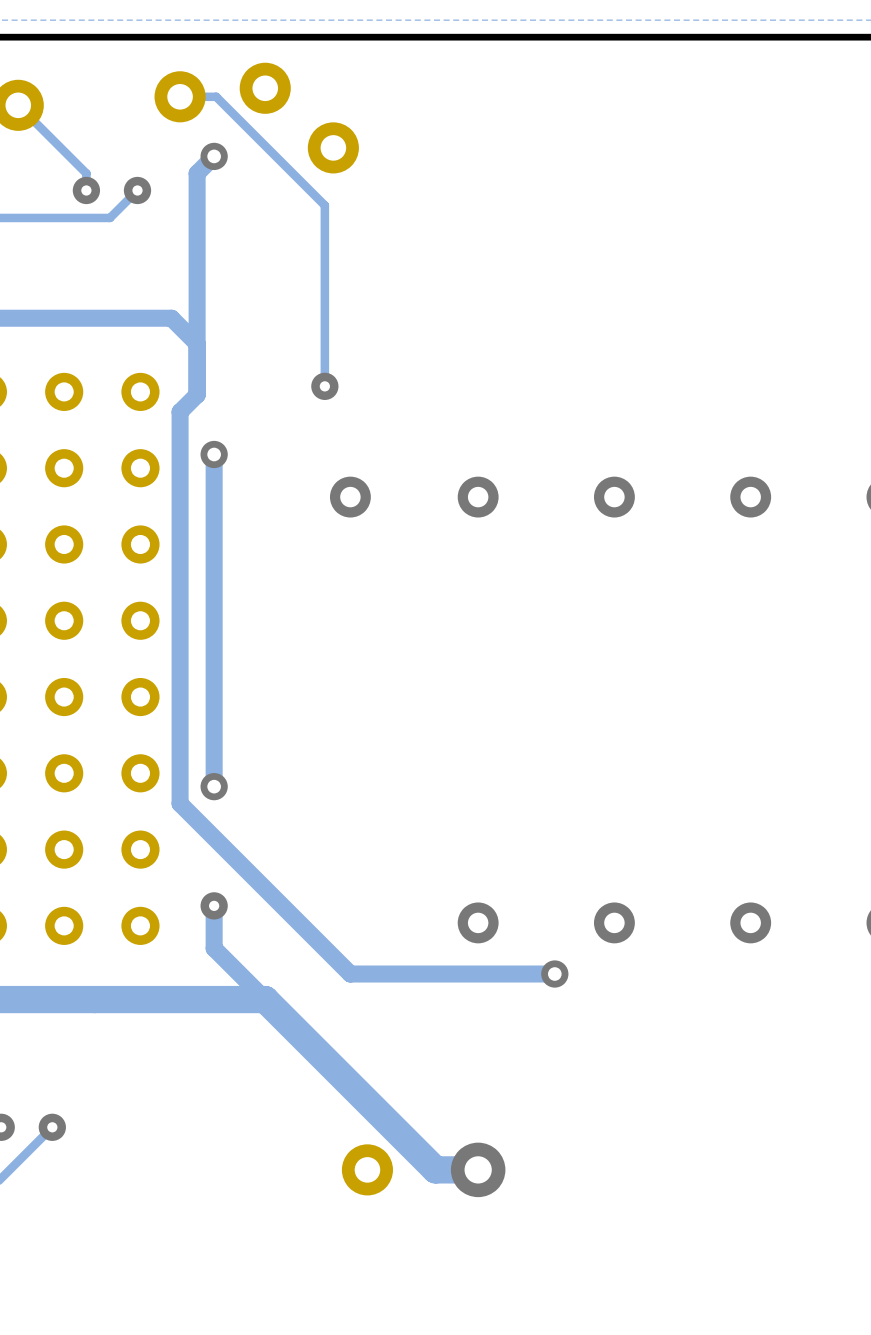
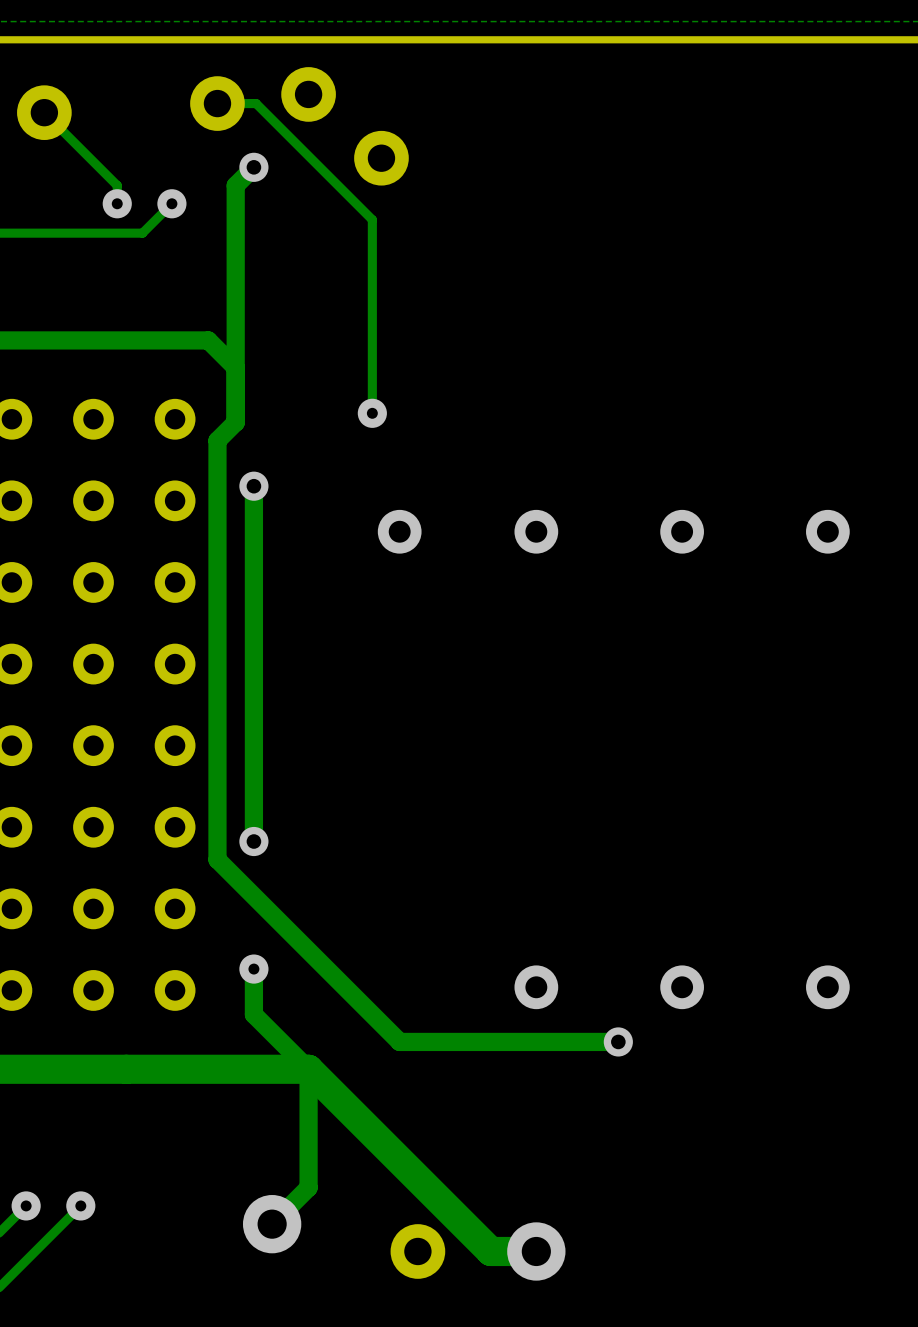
track: none -> (308, 1069) (308, 1187) (272, 1224)
via: none -> (272, 1224)

